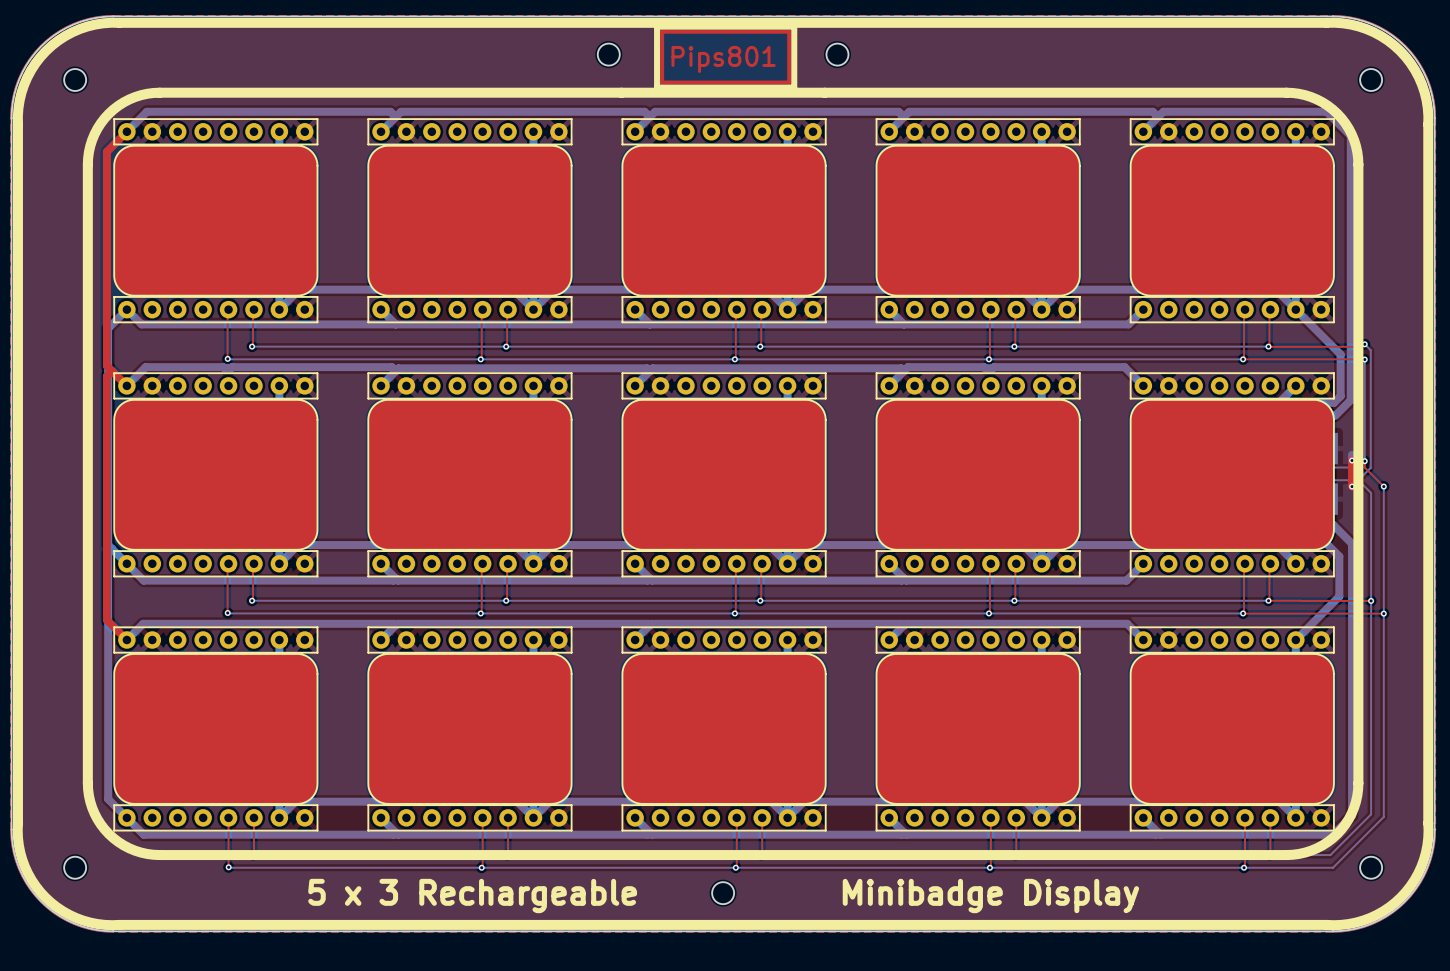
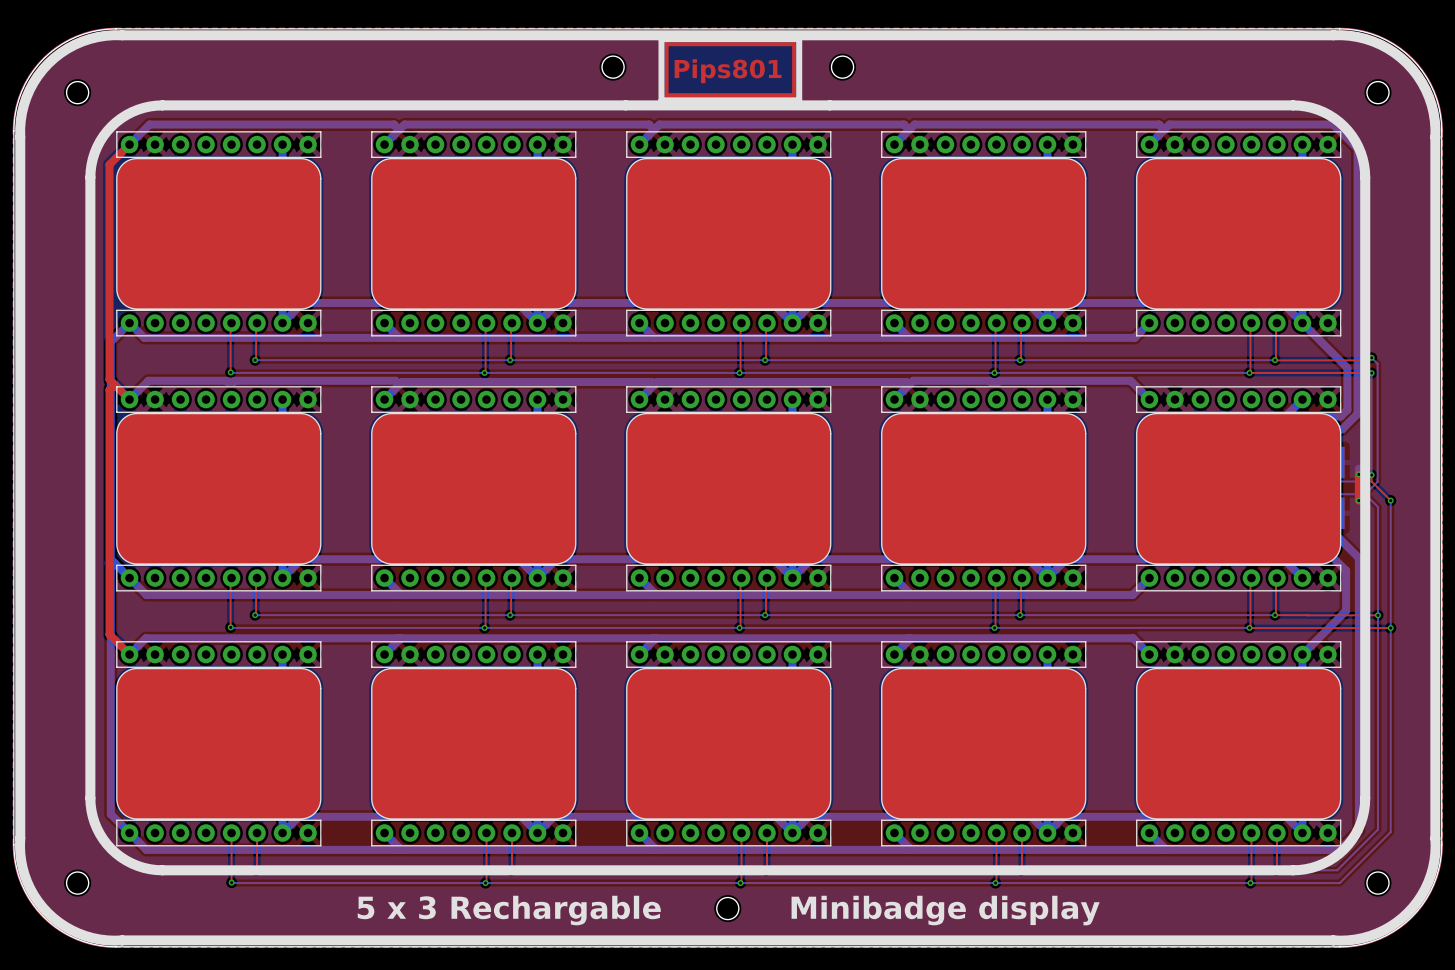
text: 5 x 3 Rechargeable Minibadge Display (723, 896) -> 5 x 3 Rechargable Minibadge display (728, 910)

